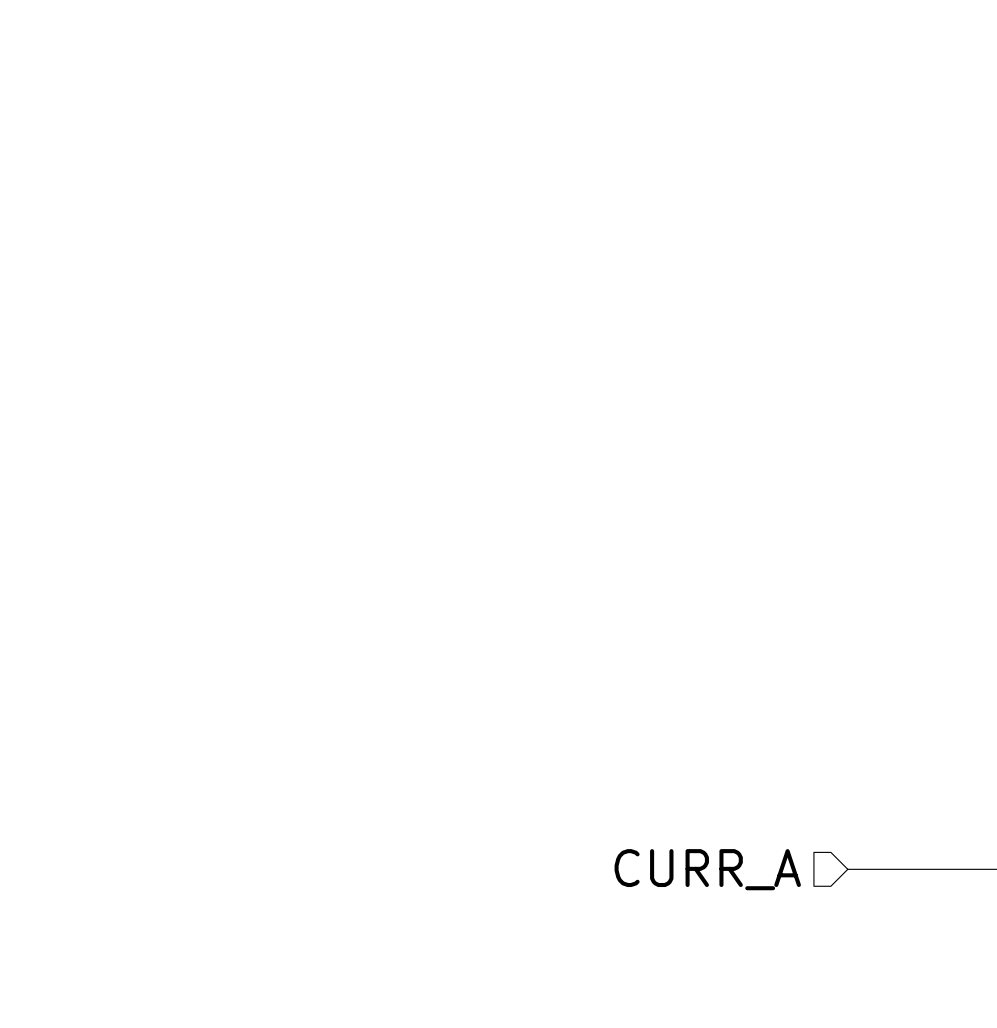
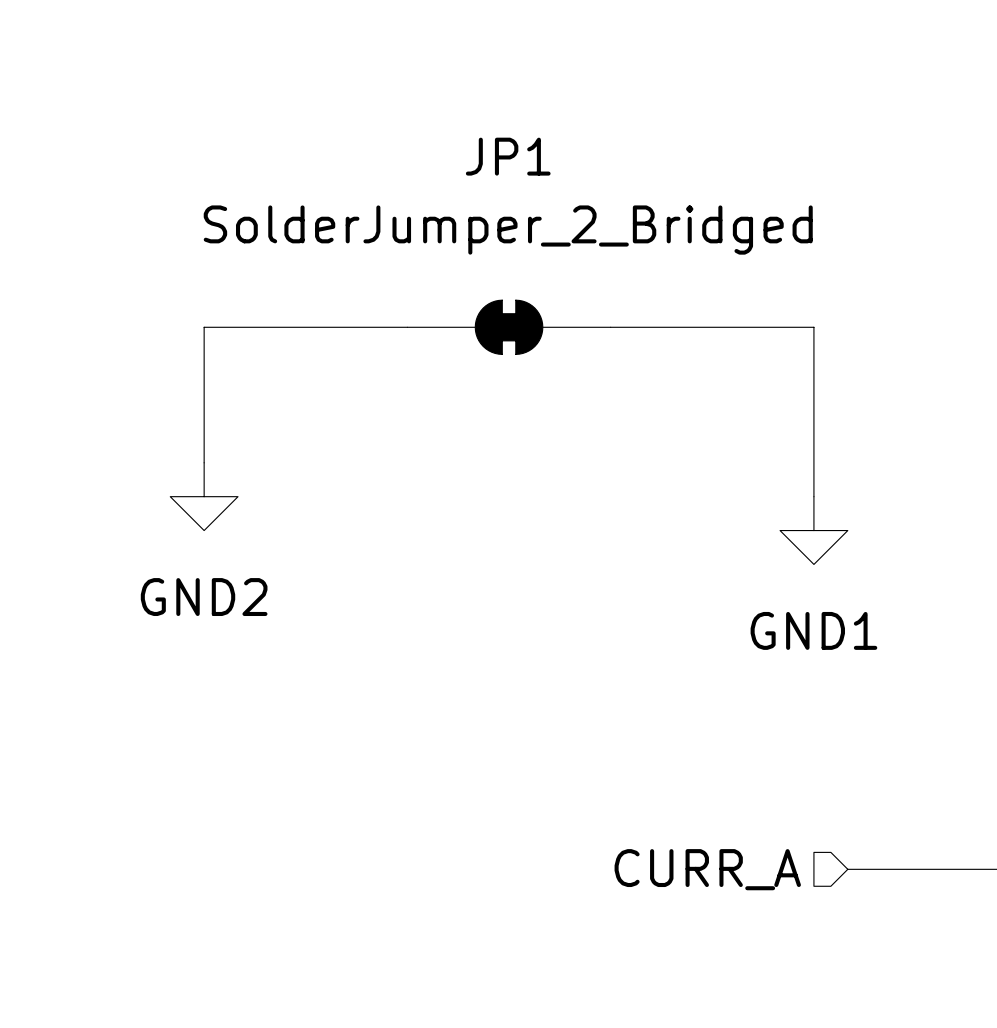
wire: none -> (407, 327) (204, 327) (204, 462)
JP1: none -> SolderJumper_2_Bridged (509, 327)
wire: none -> (610, 327) (813, 327) (813, 496)
power symbol: none -> GND2 (204, 496)
power symbol: none -> GND1 (813, 530)

